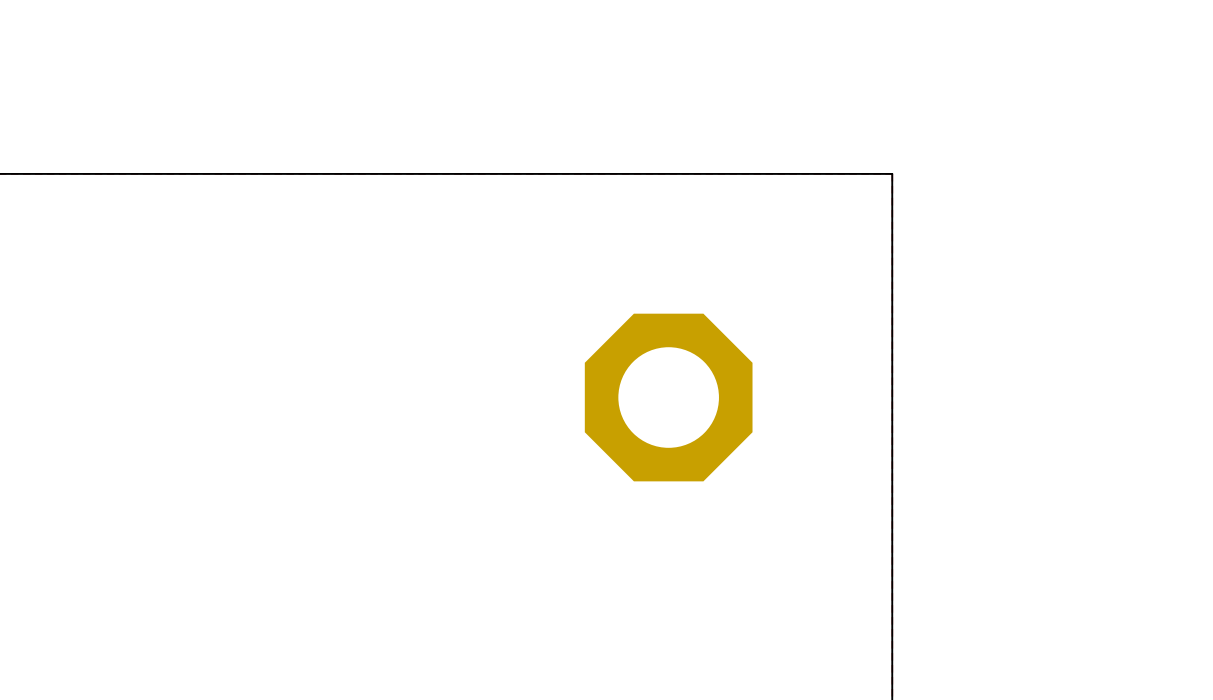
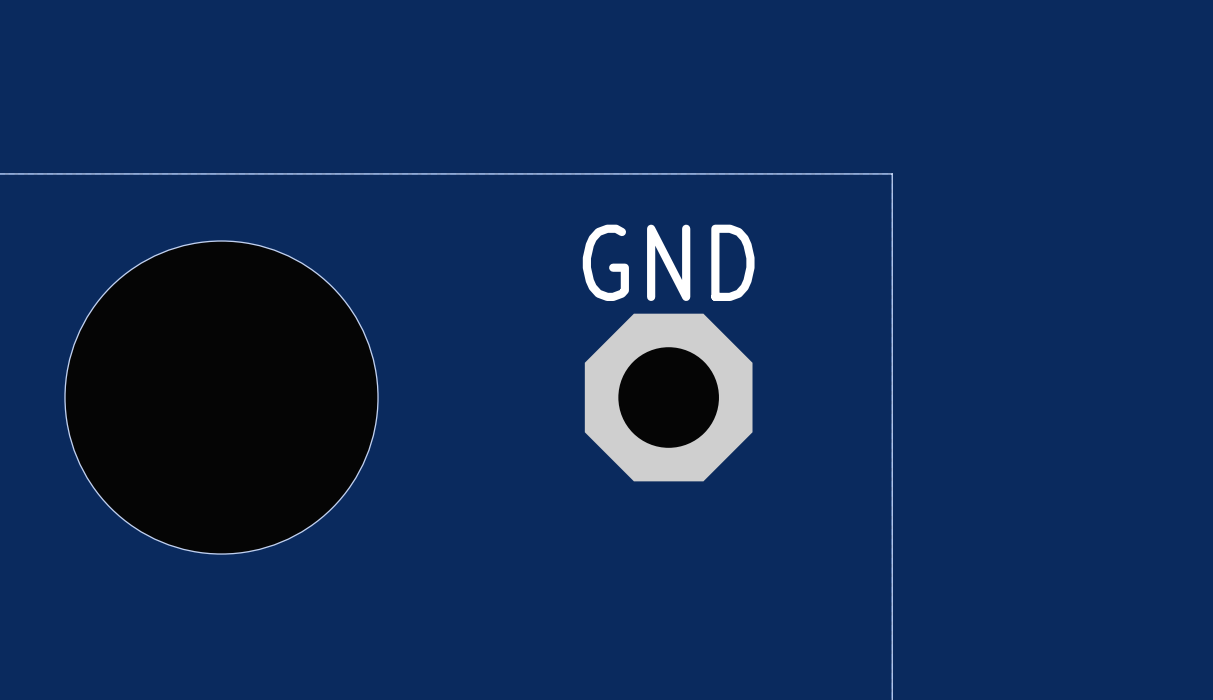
GND name: none -> GND (668, 262)
hole: none -> (221, 397)

